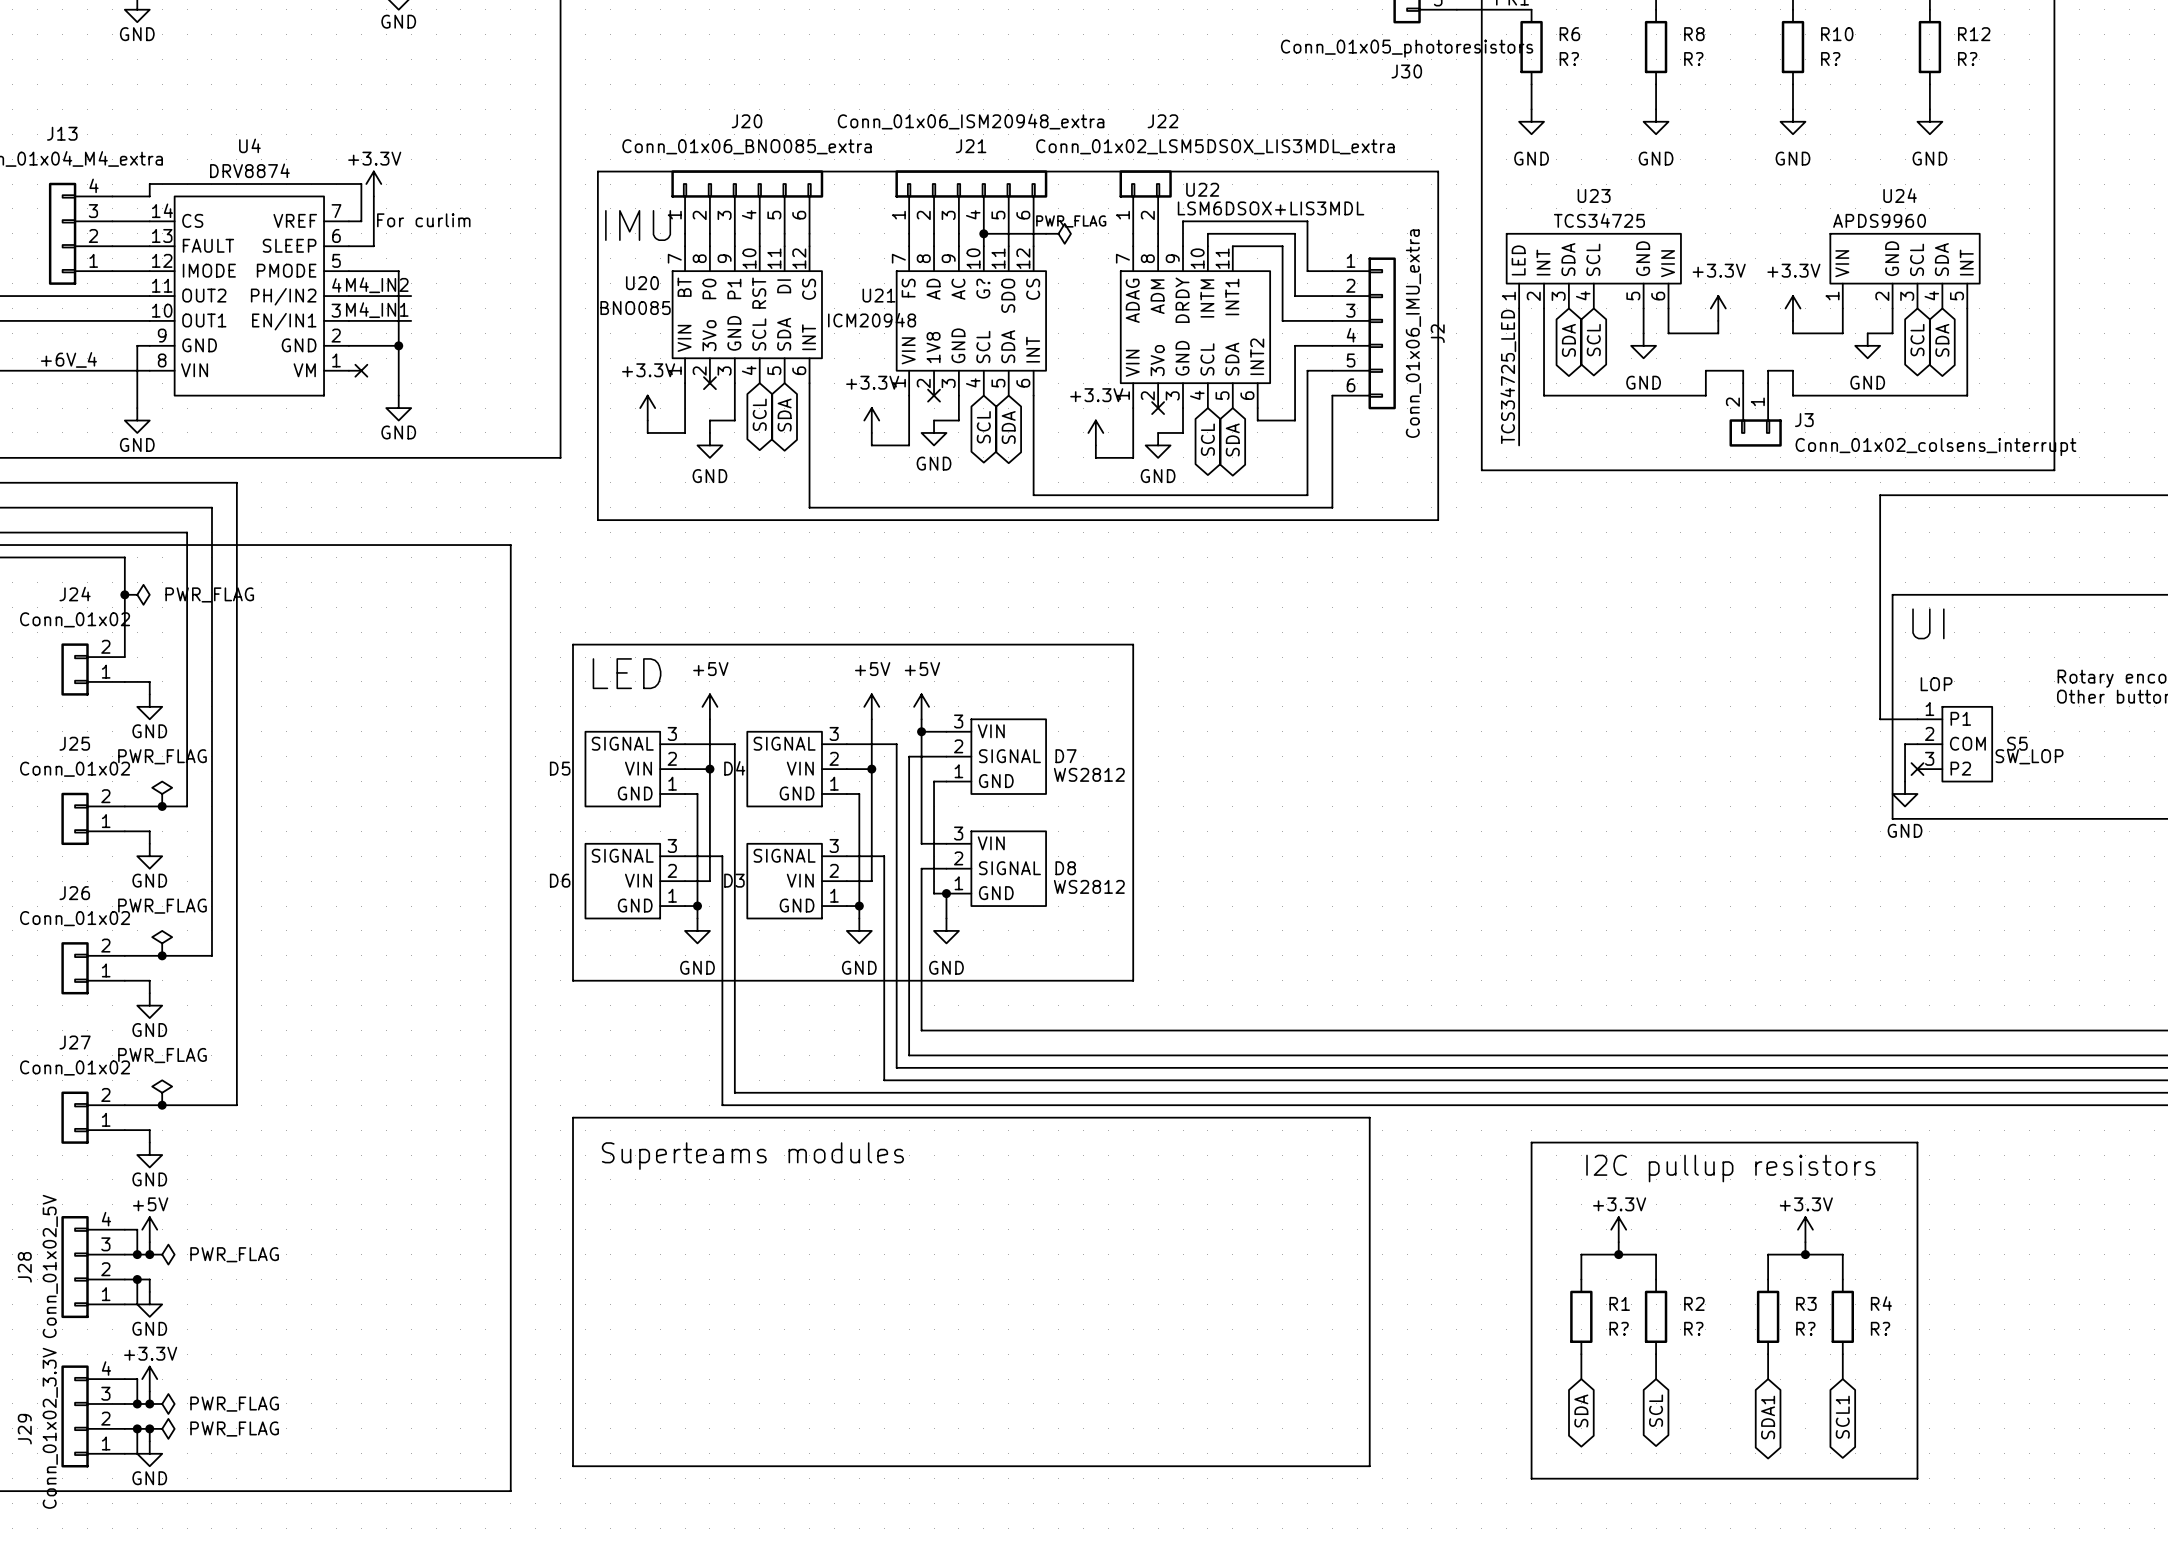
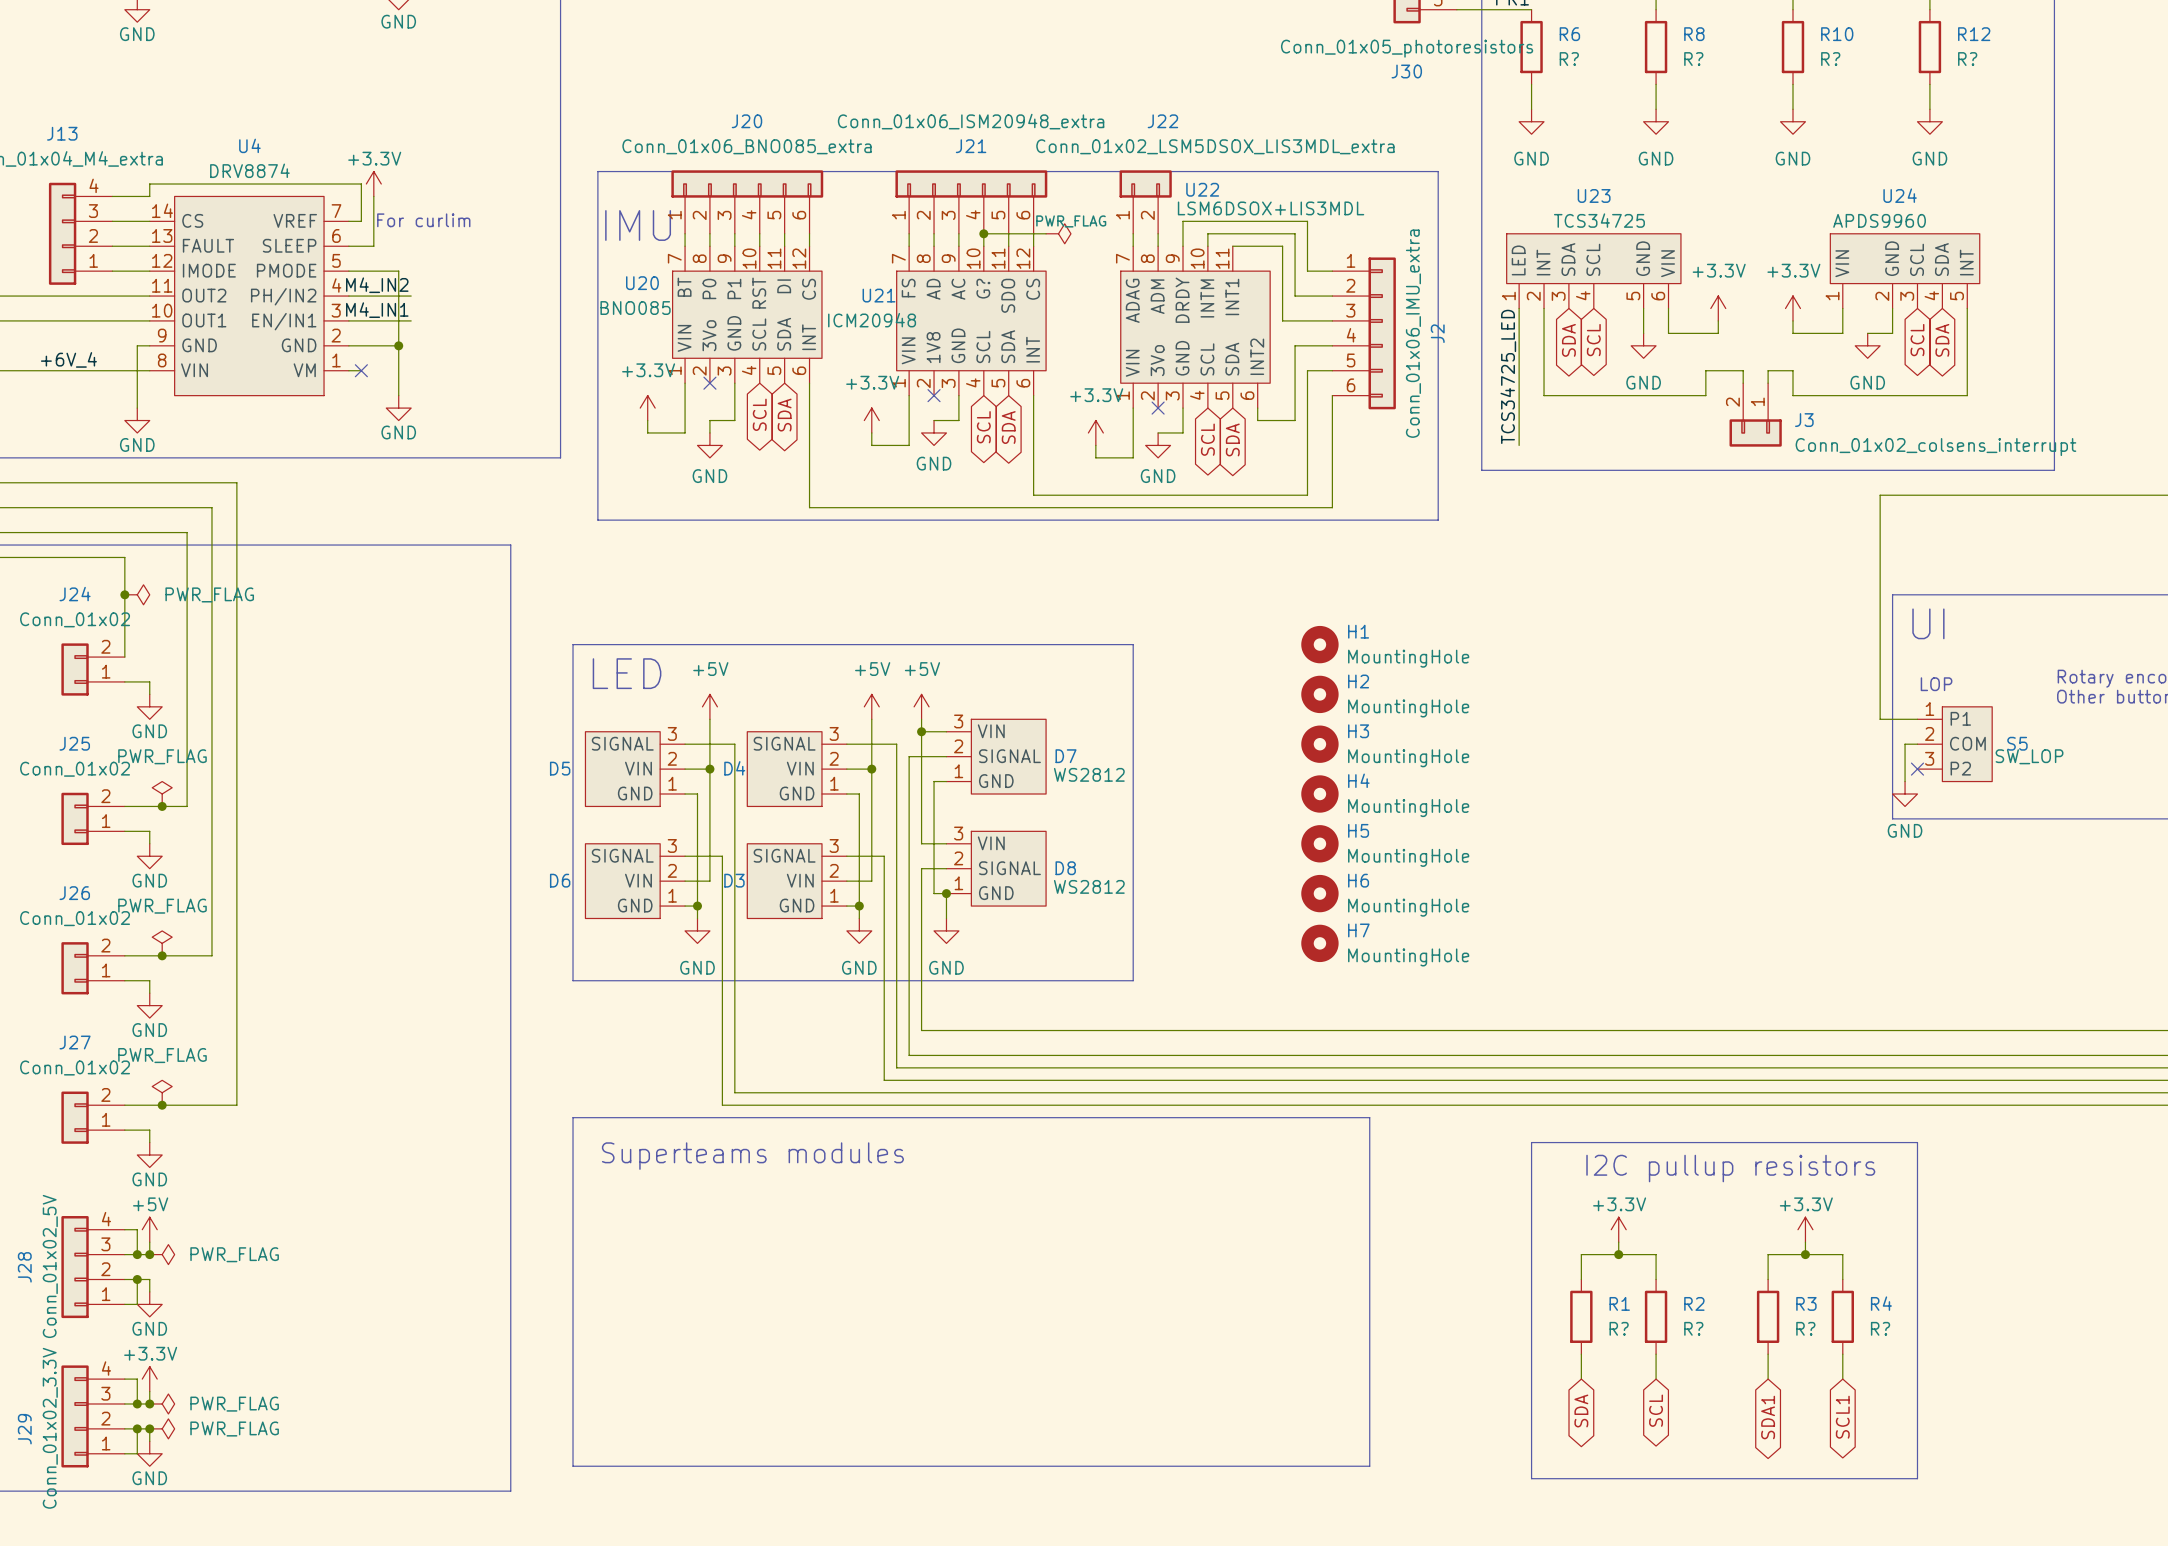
H1: none -> MountingHole (1319, 644)
H2: none -> MountingHole (1319, 694)
H3: none -> MountingHole (1319, 744)
H4: none -> MountingHole (1319, 793)
H5: none -> MountingHole (1319, 843)
H6: none -> MountingHole (1319, 893)
H7: none -> MountingHole (1319, 943)

